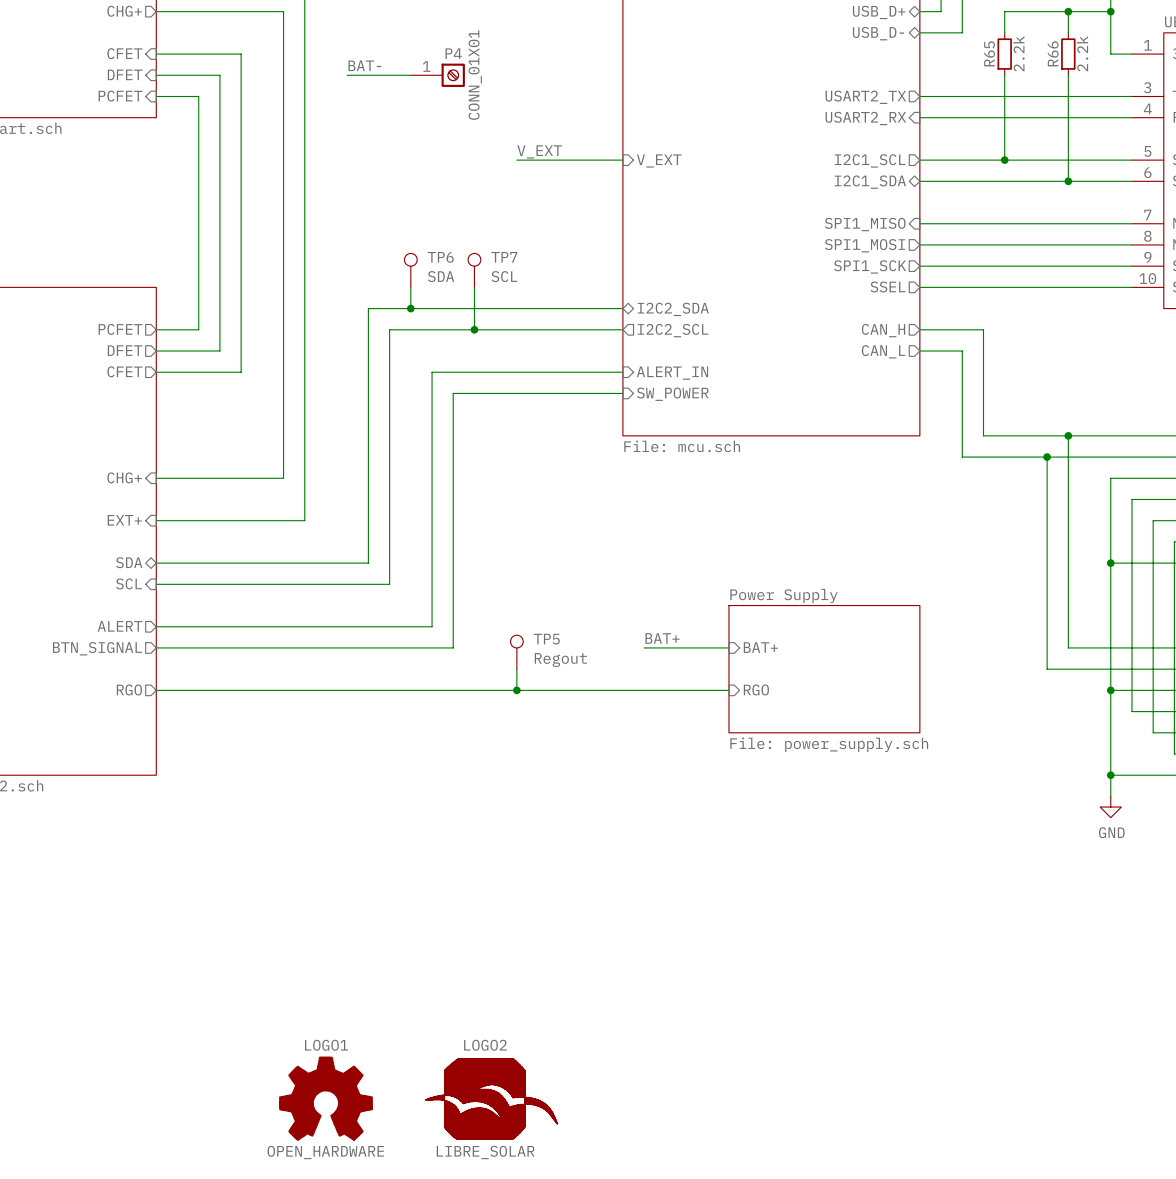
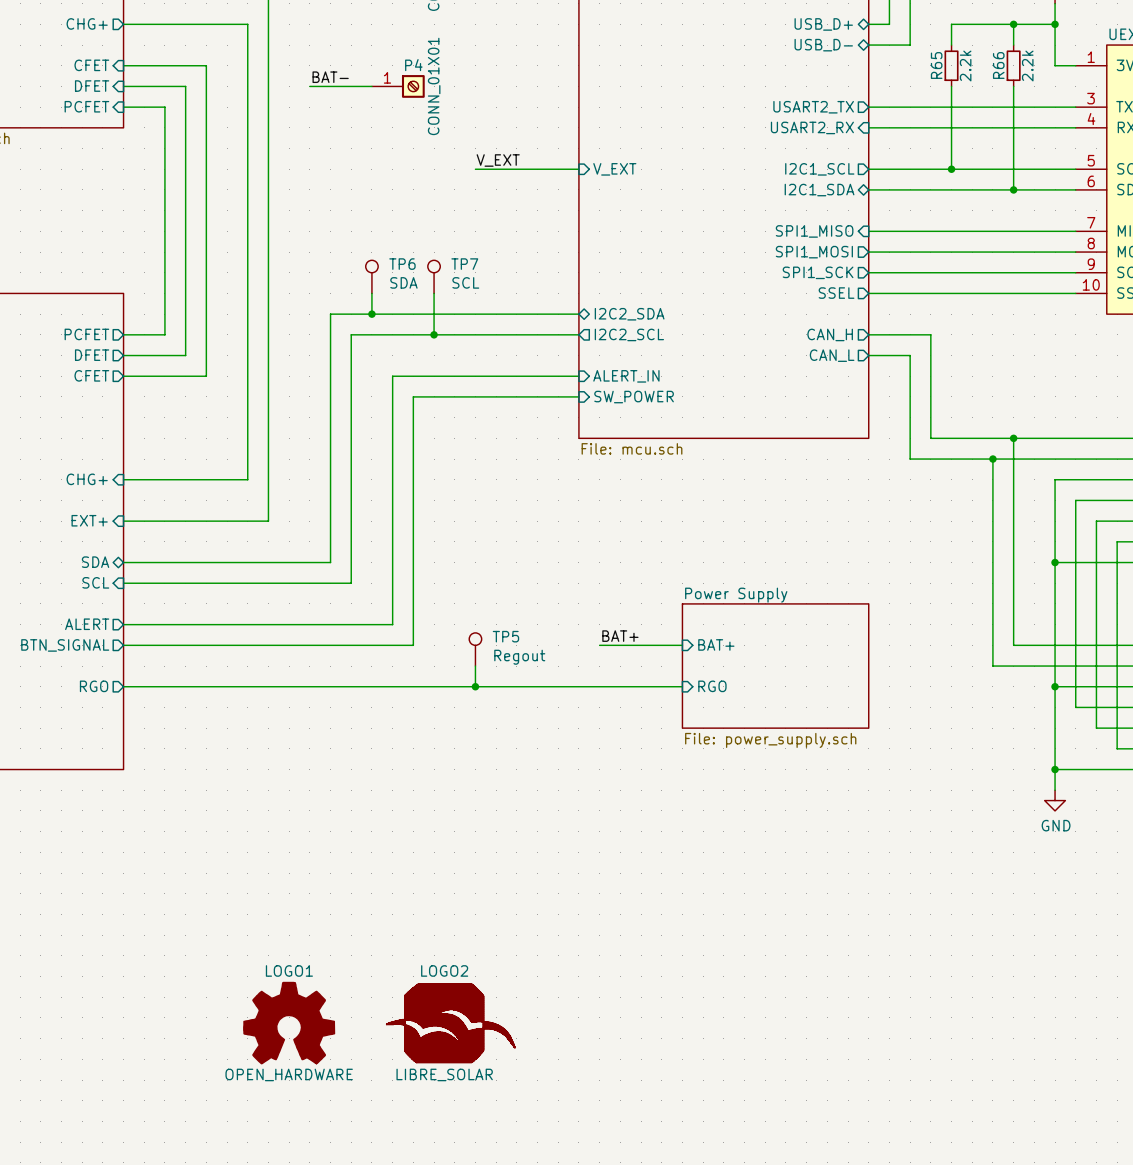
LOGO1 position: (325, 1098) -> (289, 1023)
LOGO2 position: (491, 1098) -> (450, 1023)

